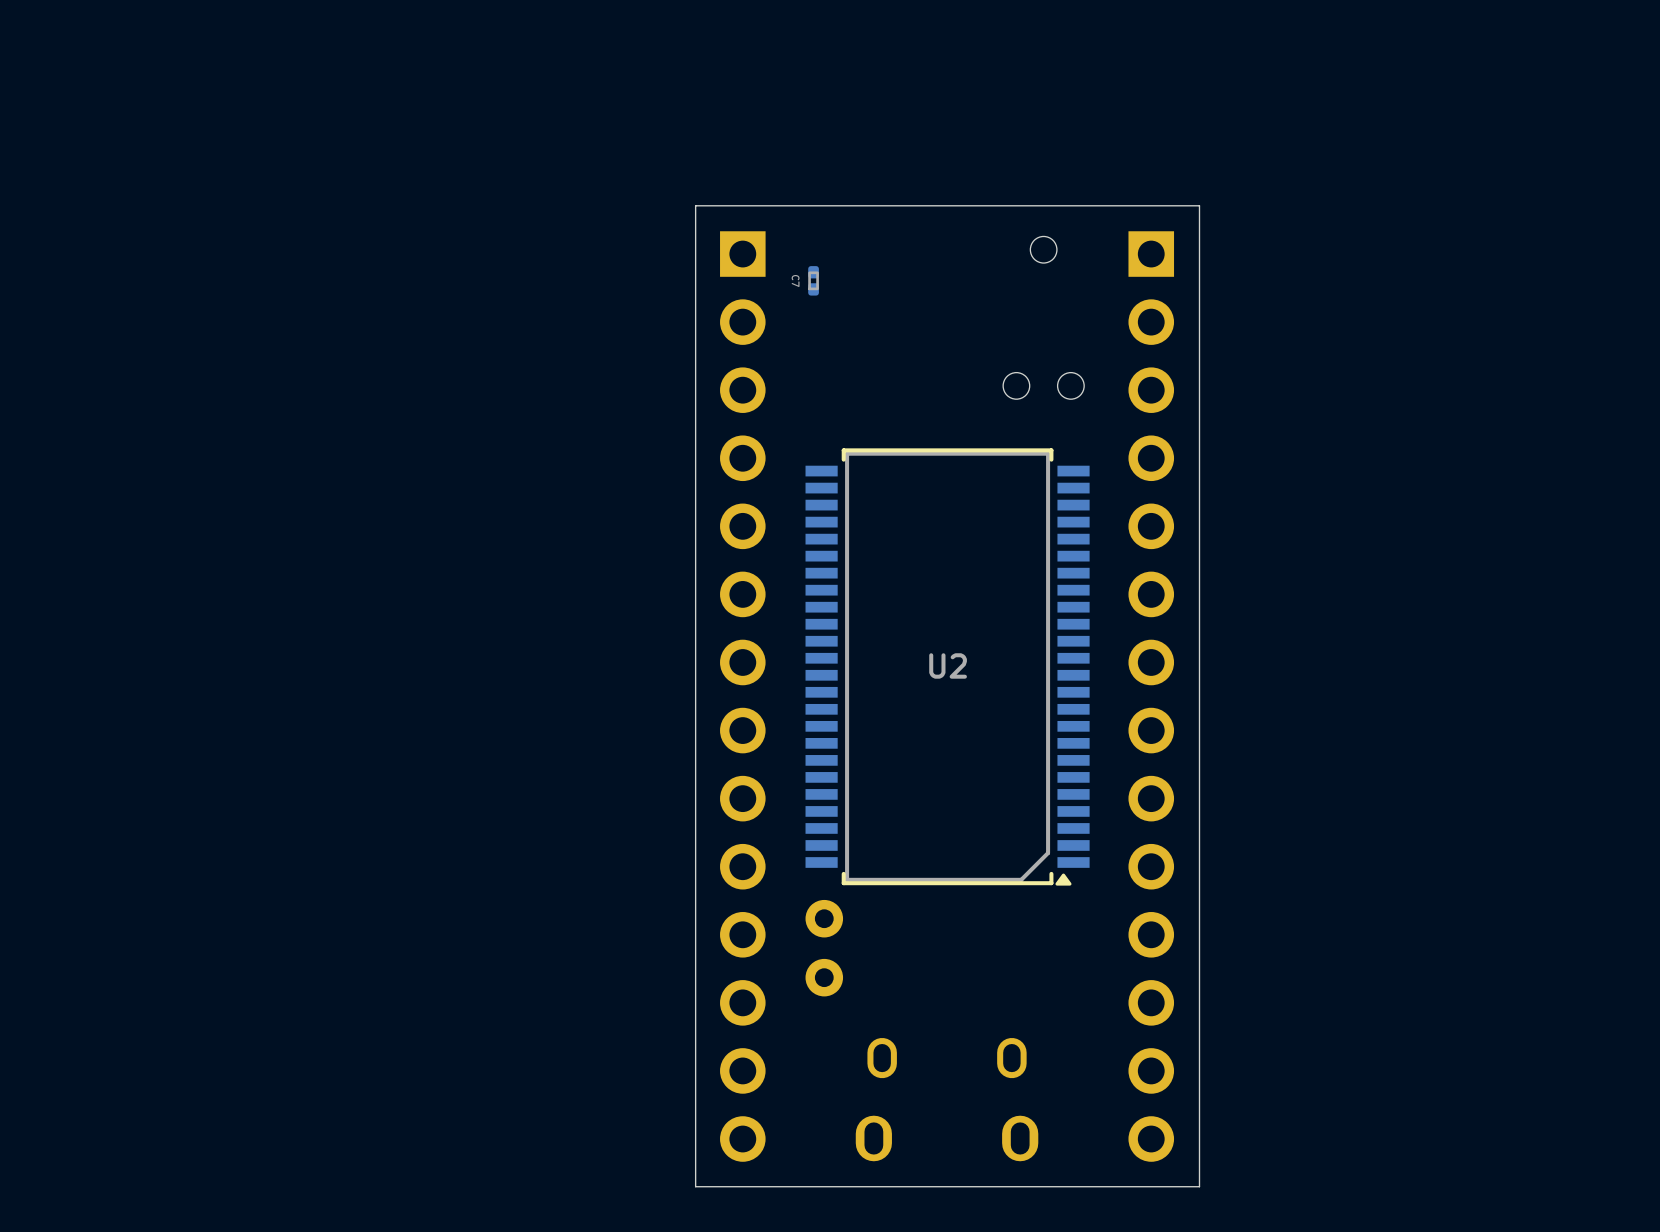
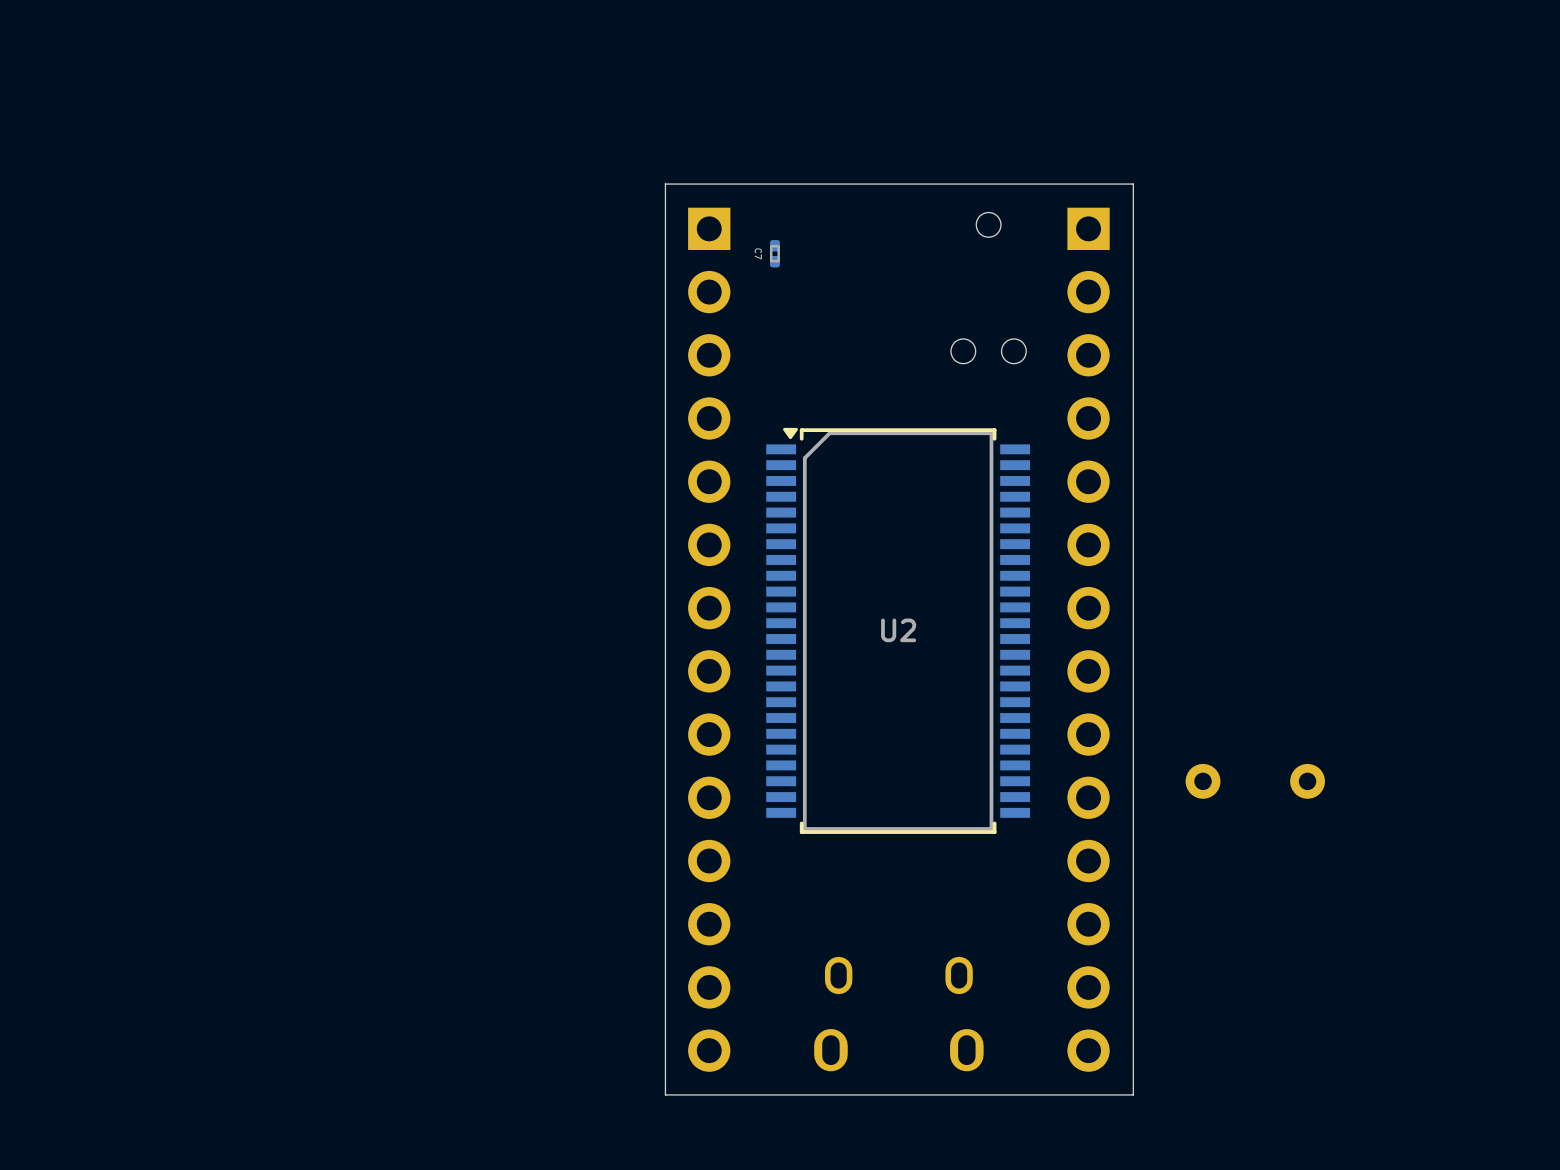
U2 rotation: 0° (947, 666) -> 180° (898, 630)
part: none -> (1203, 781)
part: none -> (1307, 781)
part: (824, 918) -> none
part: (824, 977) -> none

